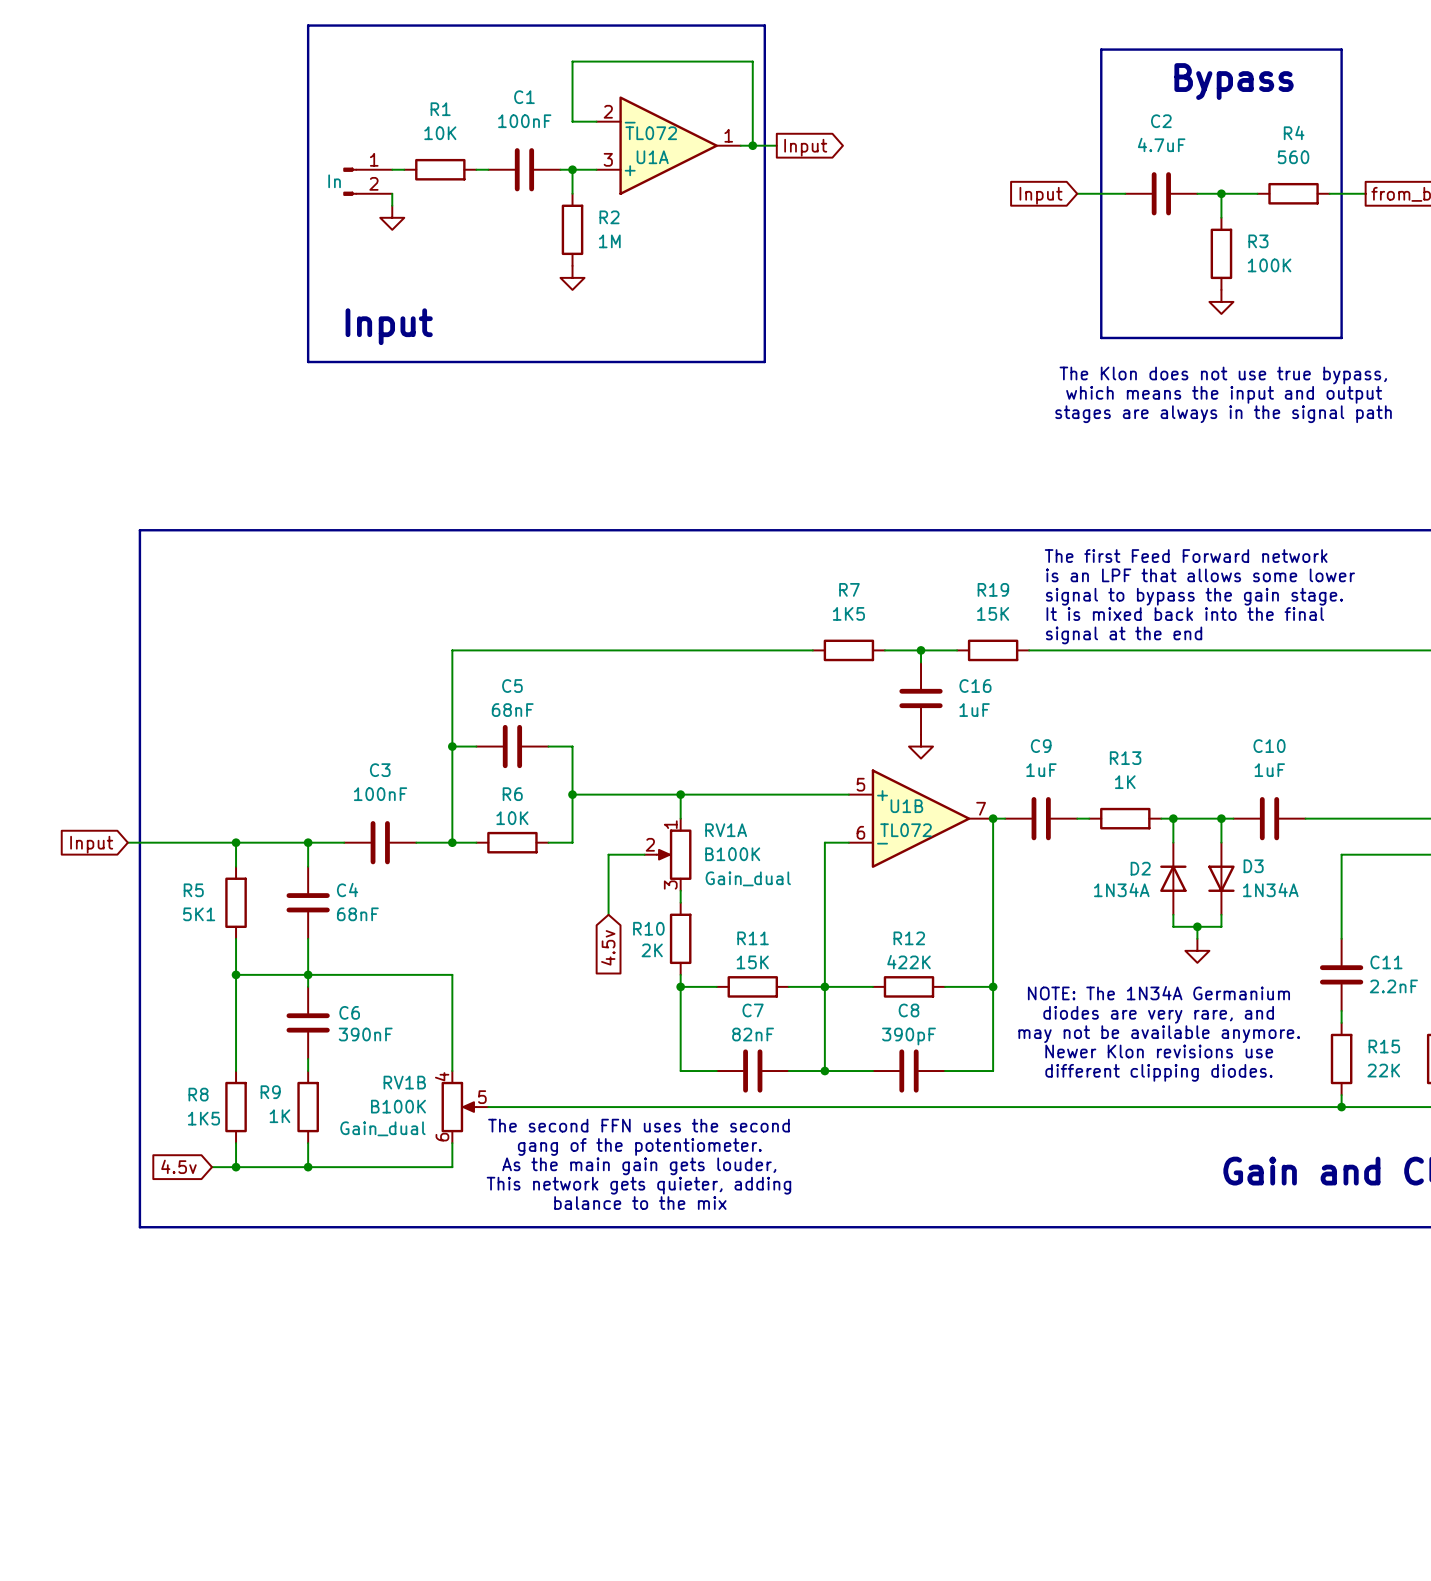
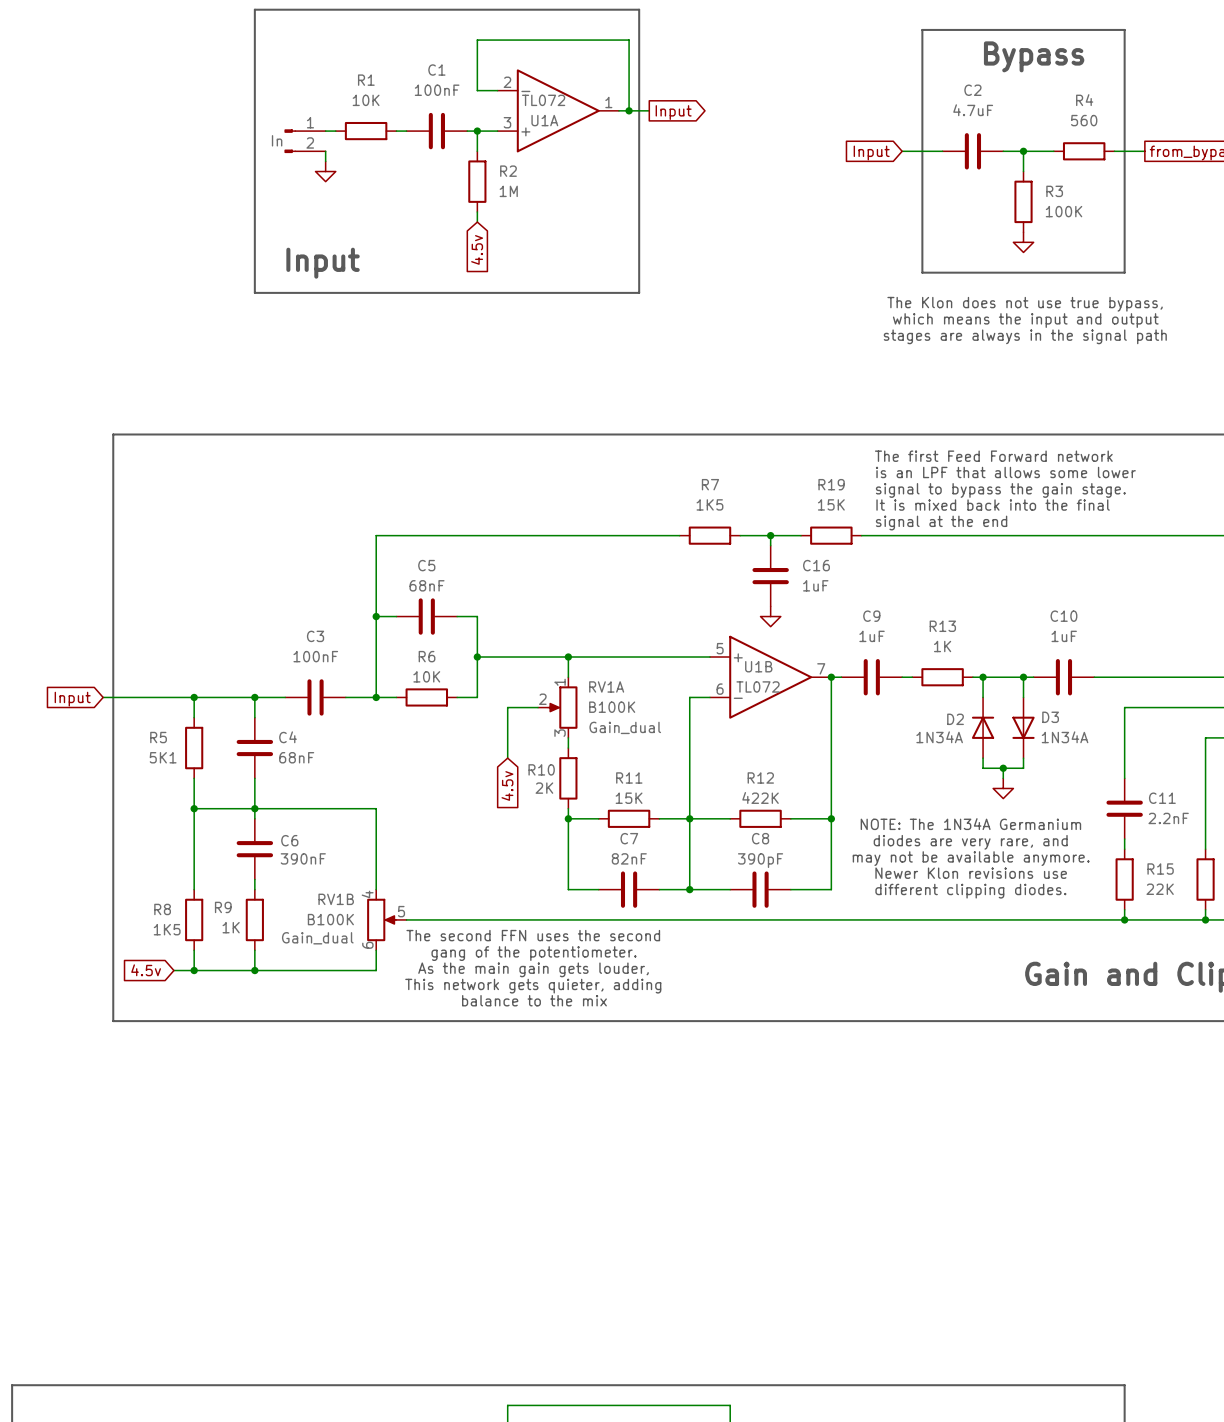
power symbol: (572, 277) -> none
global label: none -> 4.5v (477, 249)

